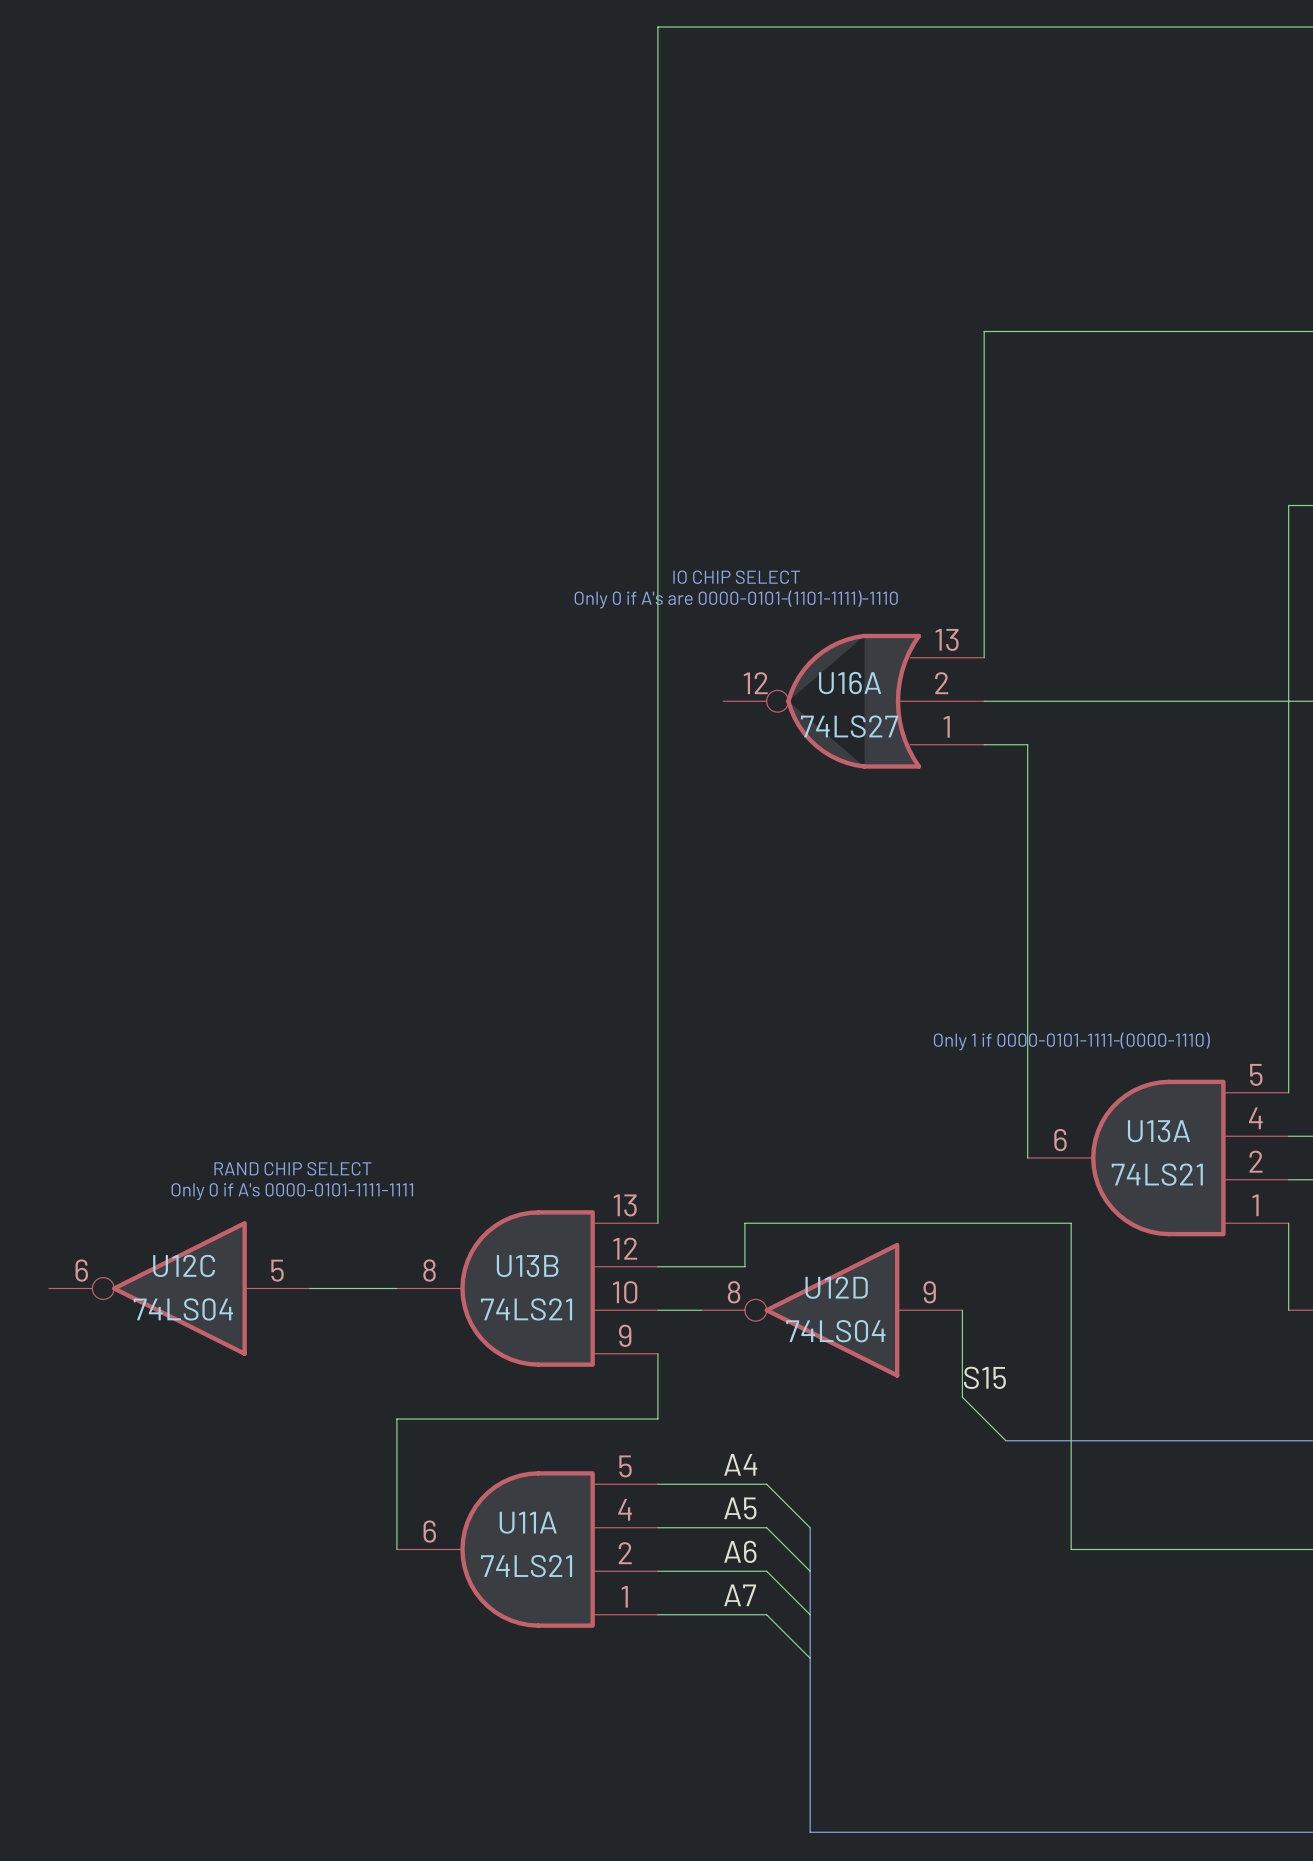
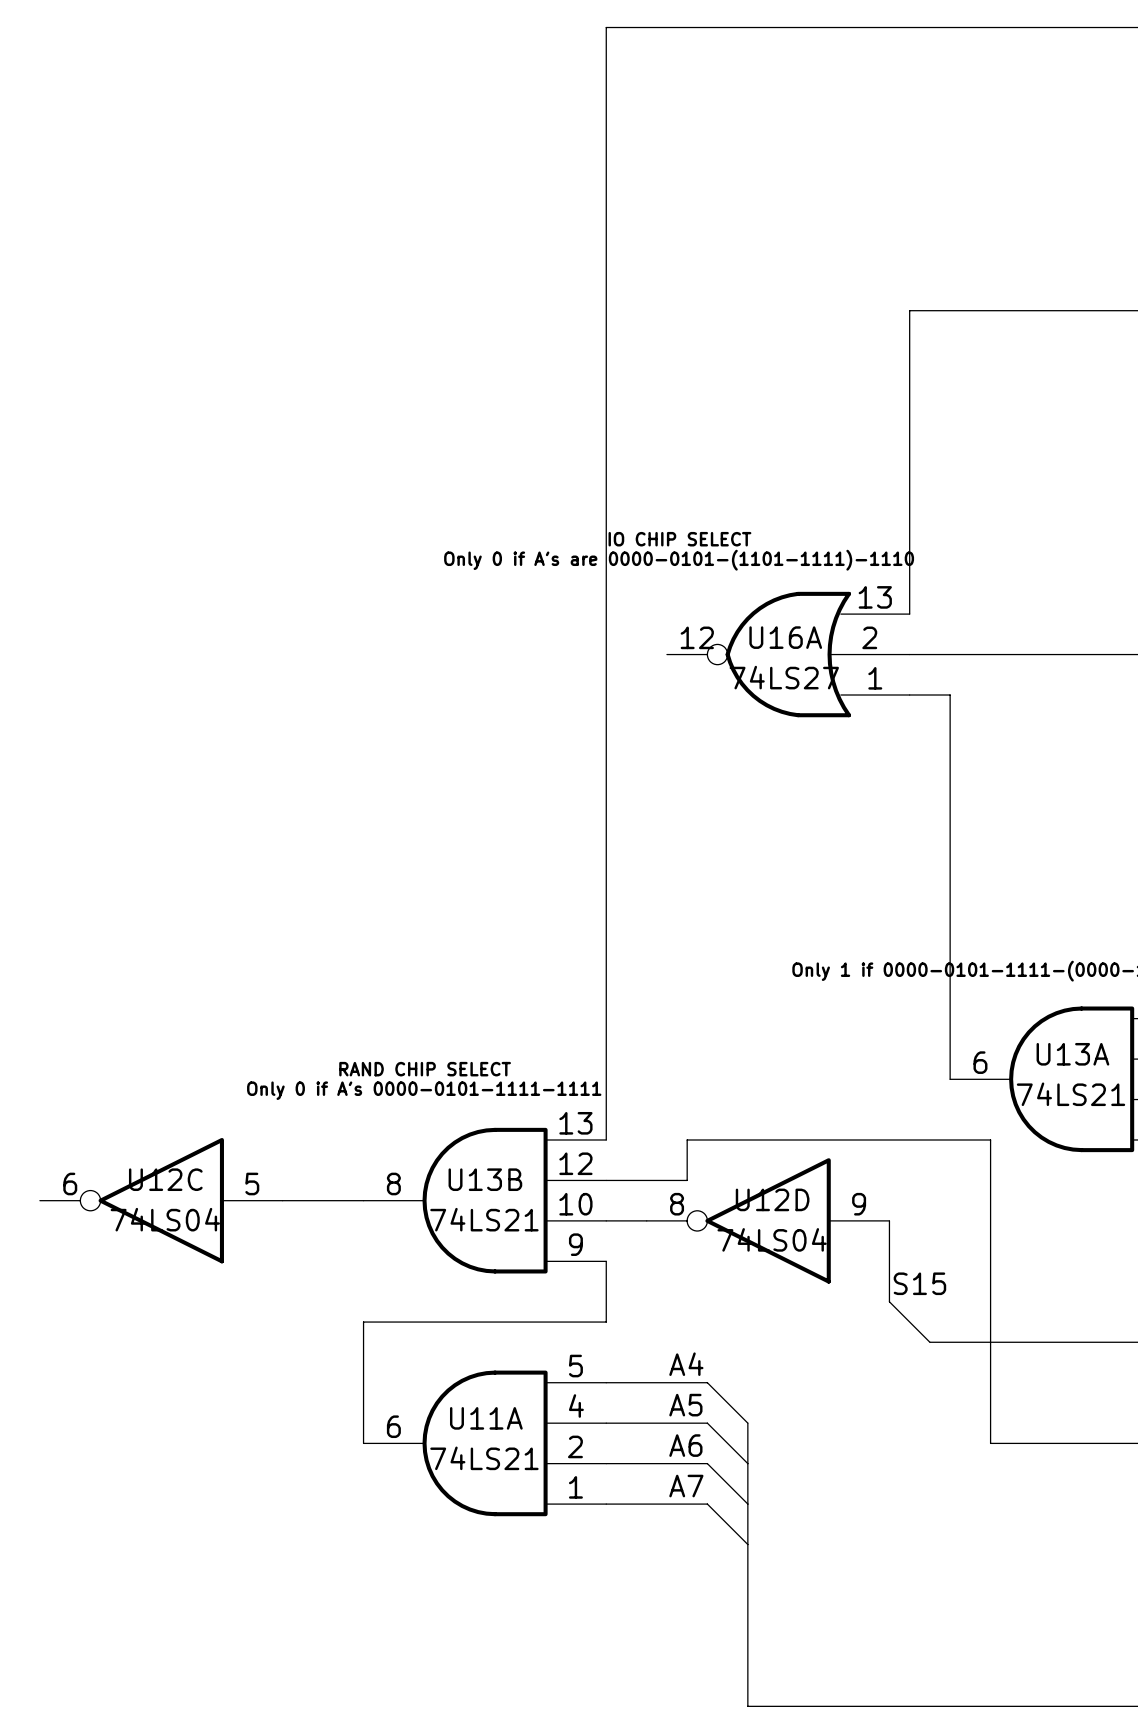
text position: RAND CHIP SELECT (292, 1168) -> RAND CHIP SELECT (425, 1069)
text position: Only 0 if A's 0000-0101-1111-1111 (292, 1191) -> Only 0 if A's 0000-0101-1111-1111 (424, 1090)

